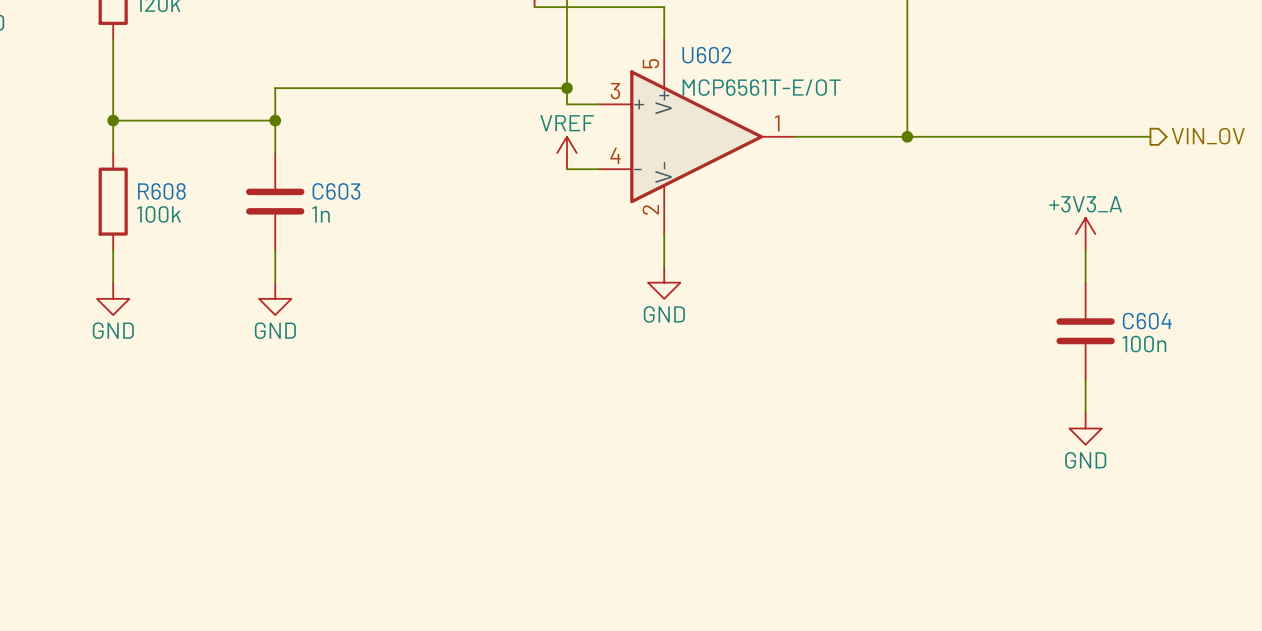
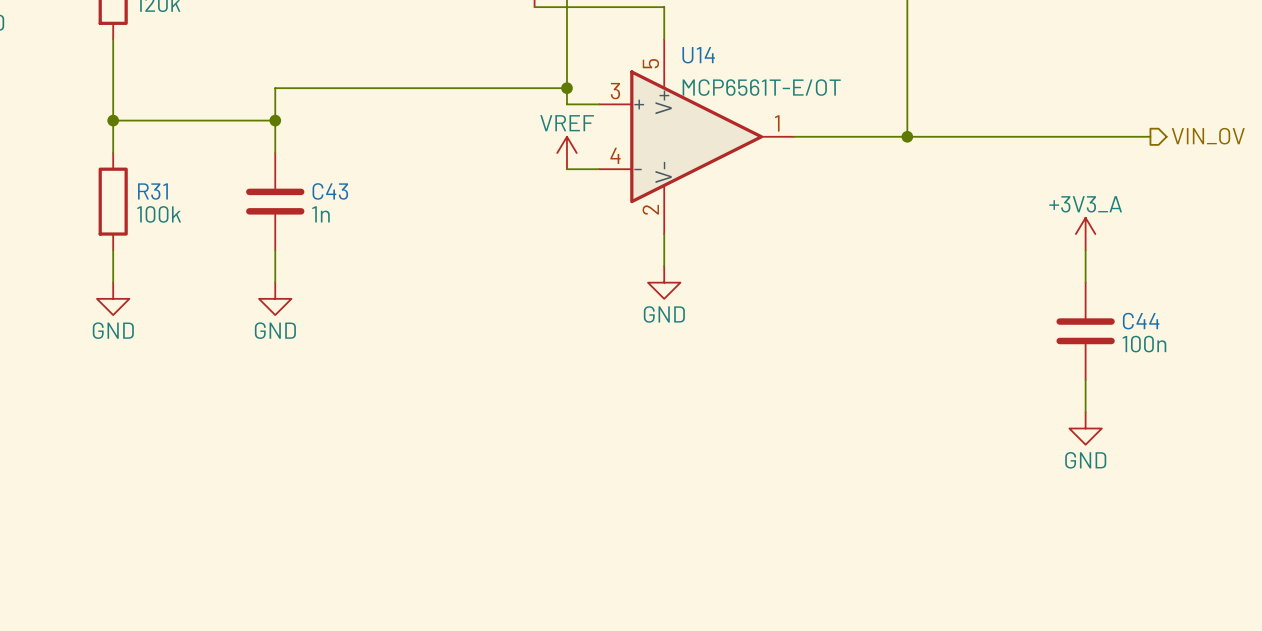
U602 name: U602 (706, 55) -> U14 (698, 55)
R608 name: R608 (161, 191) -> R31 (152, 191)
C603 name: C603 (336, 191) -> C43 (330, 191)
C604 name: C604 (1147, 321) -> C44 (1141, 321)

